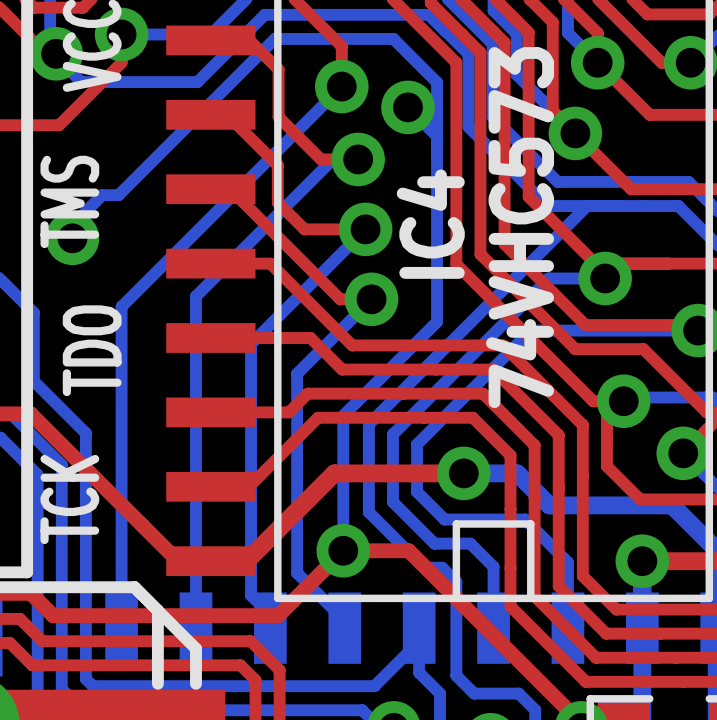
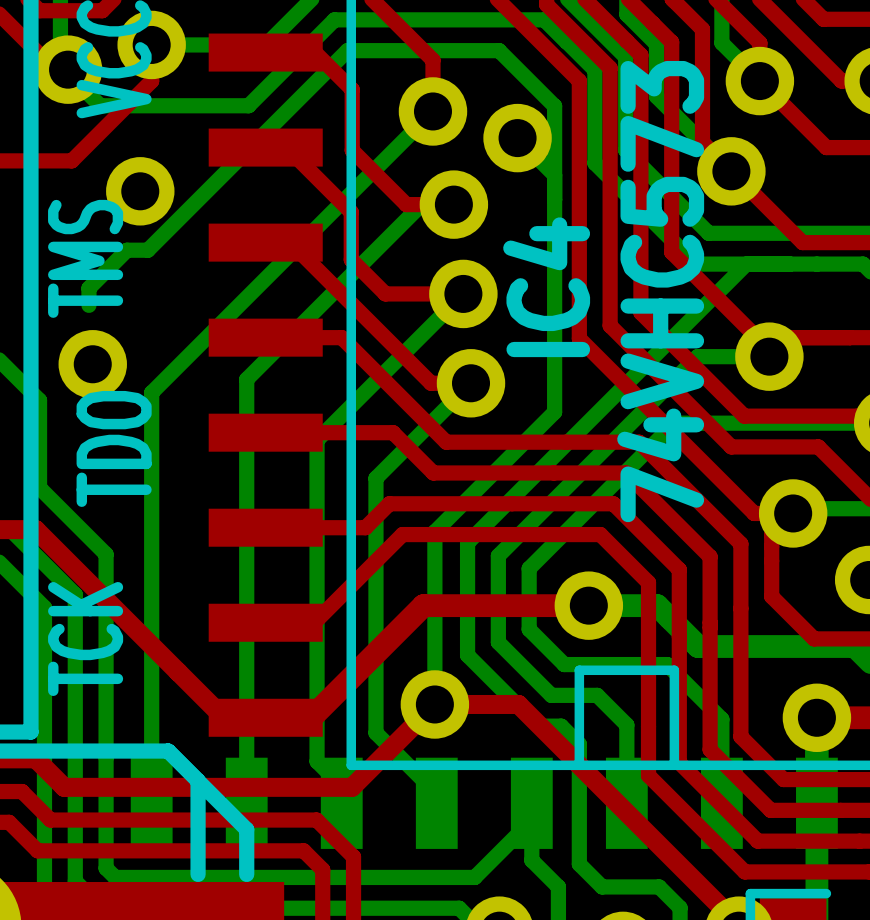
part: none -> (140, 191)
part position: (72, 238) -> (92, 364)

